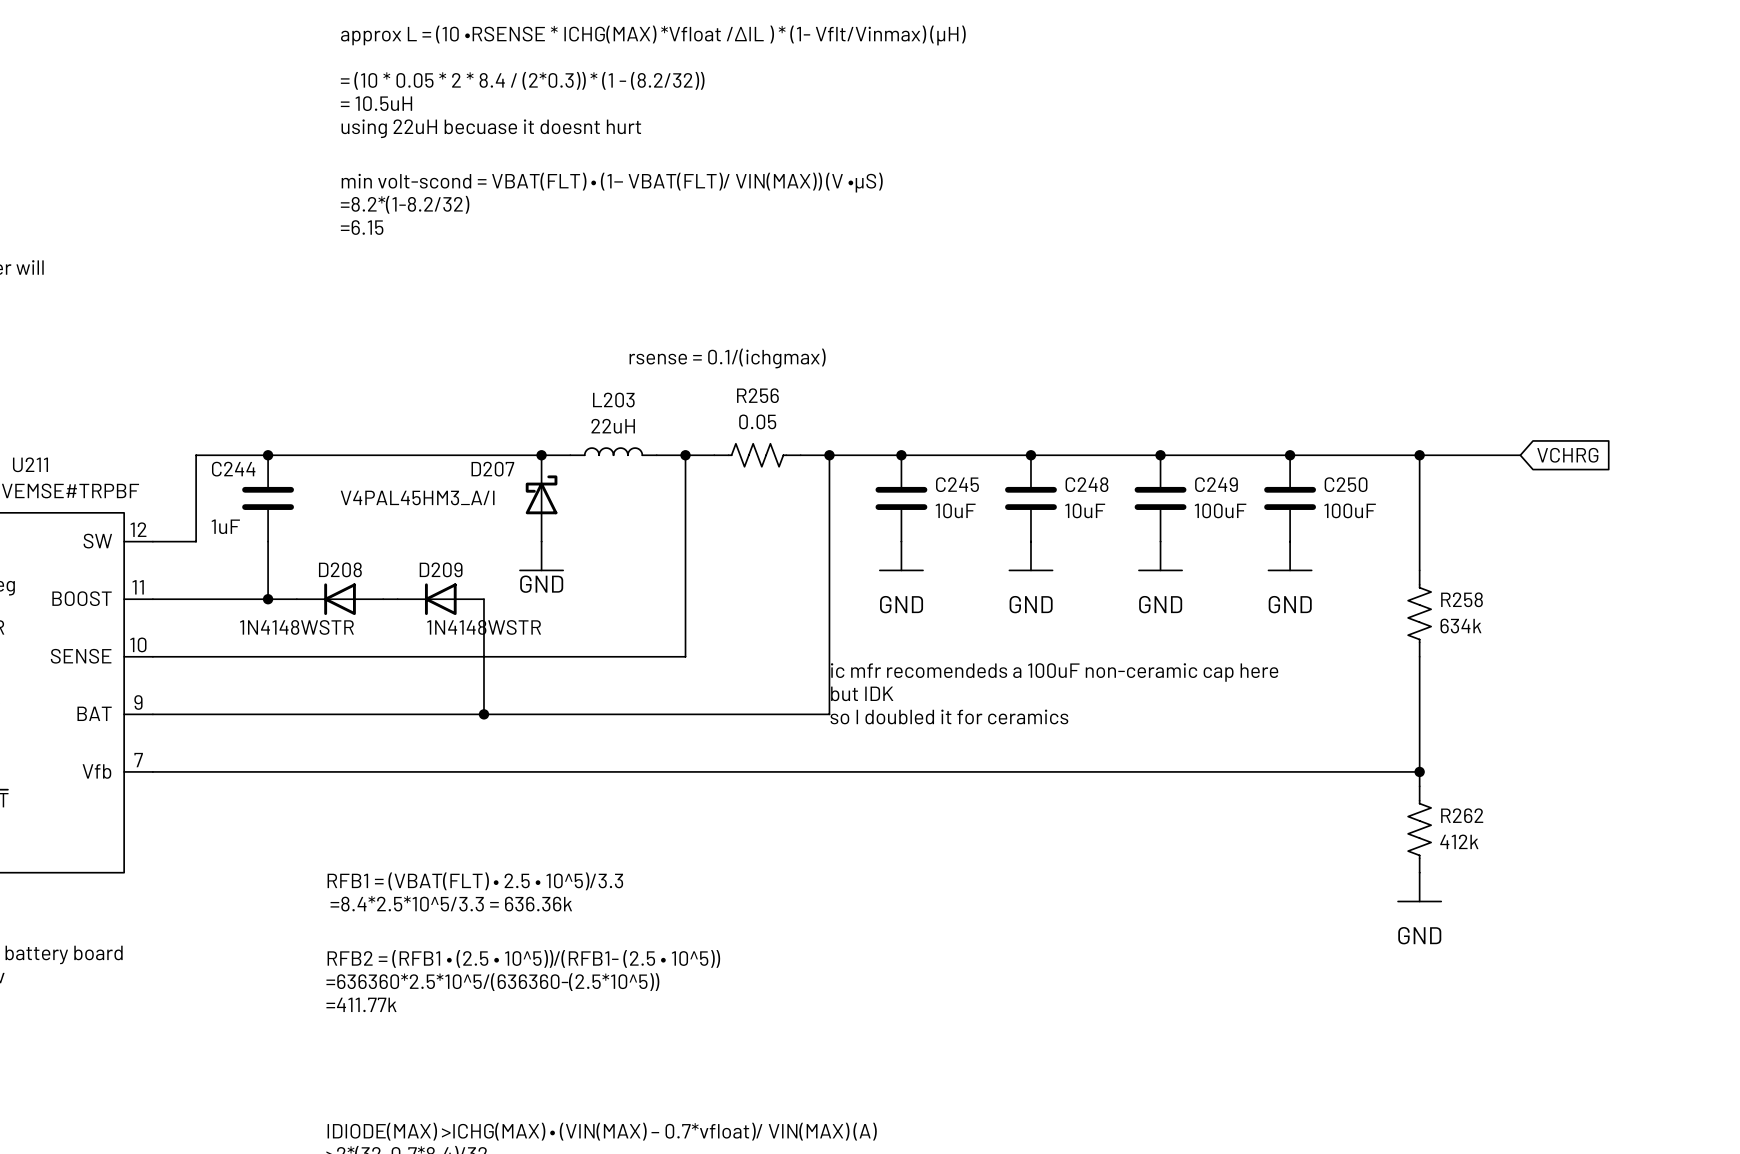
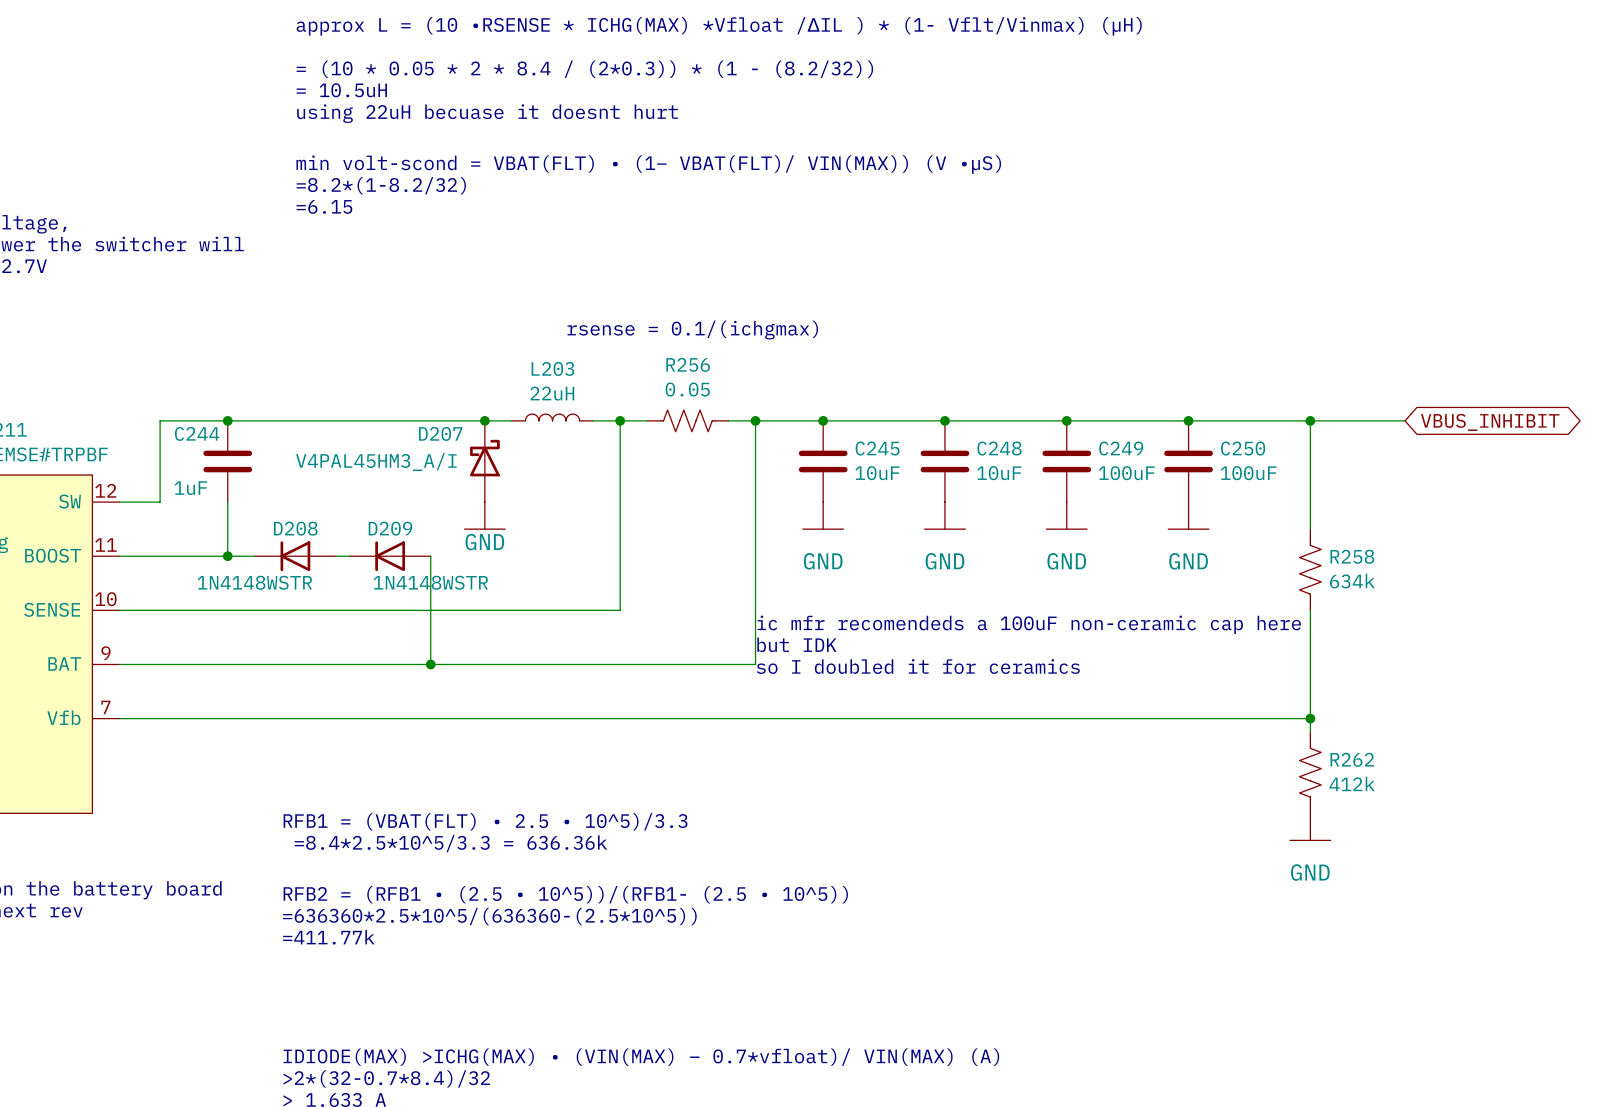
global label shape: input (1567, 455) -> bidirectional (1490, 422)
global label: VCHRG (1567, 455) -> VBUS_INHIBIT (1490, 422)

